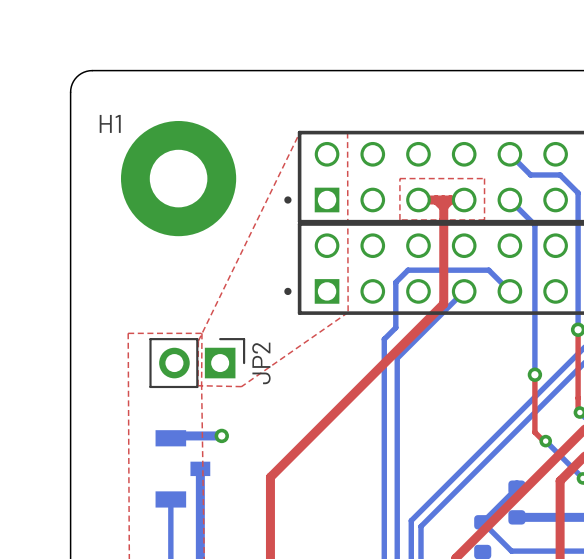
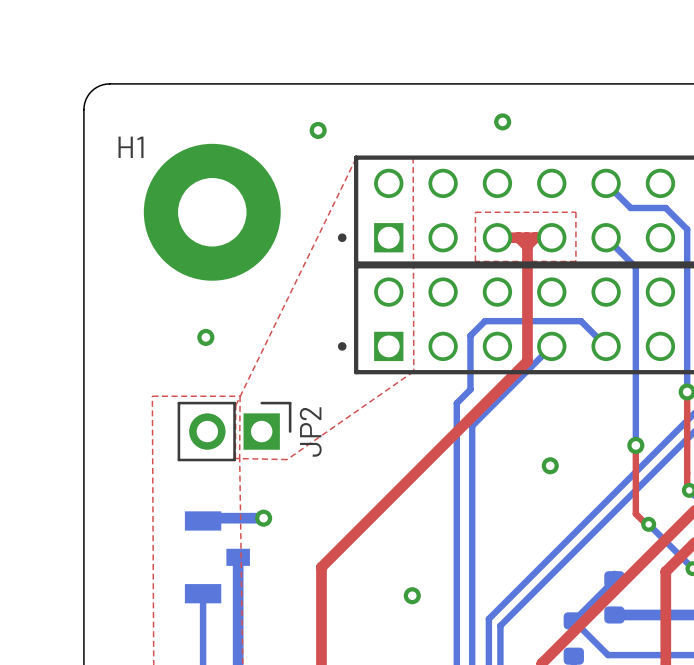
via: none -> (502, 121)
via: none -> (318, 130)
via: none -> (205, 337)
via: none -> (550, 465)
via: none -> (412, 595)

